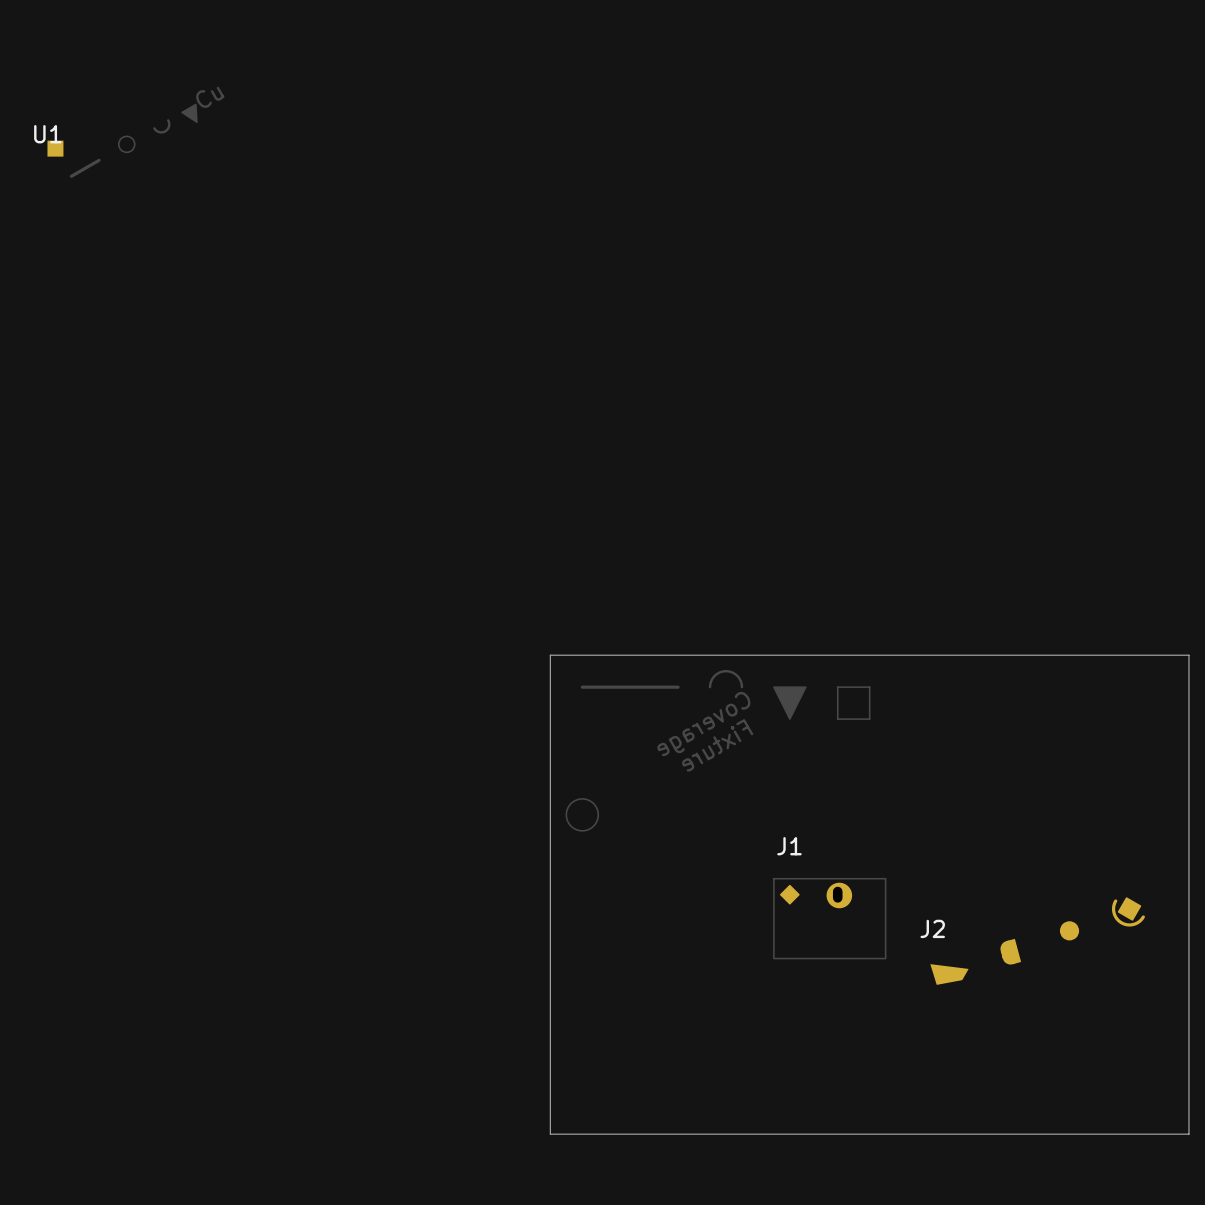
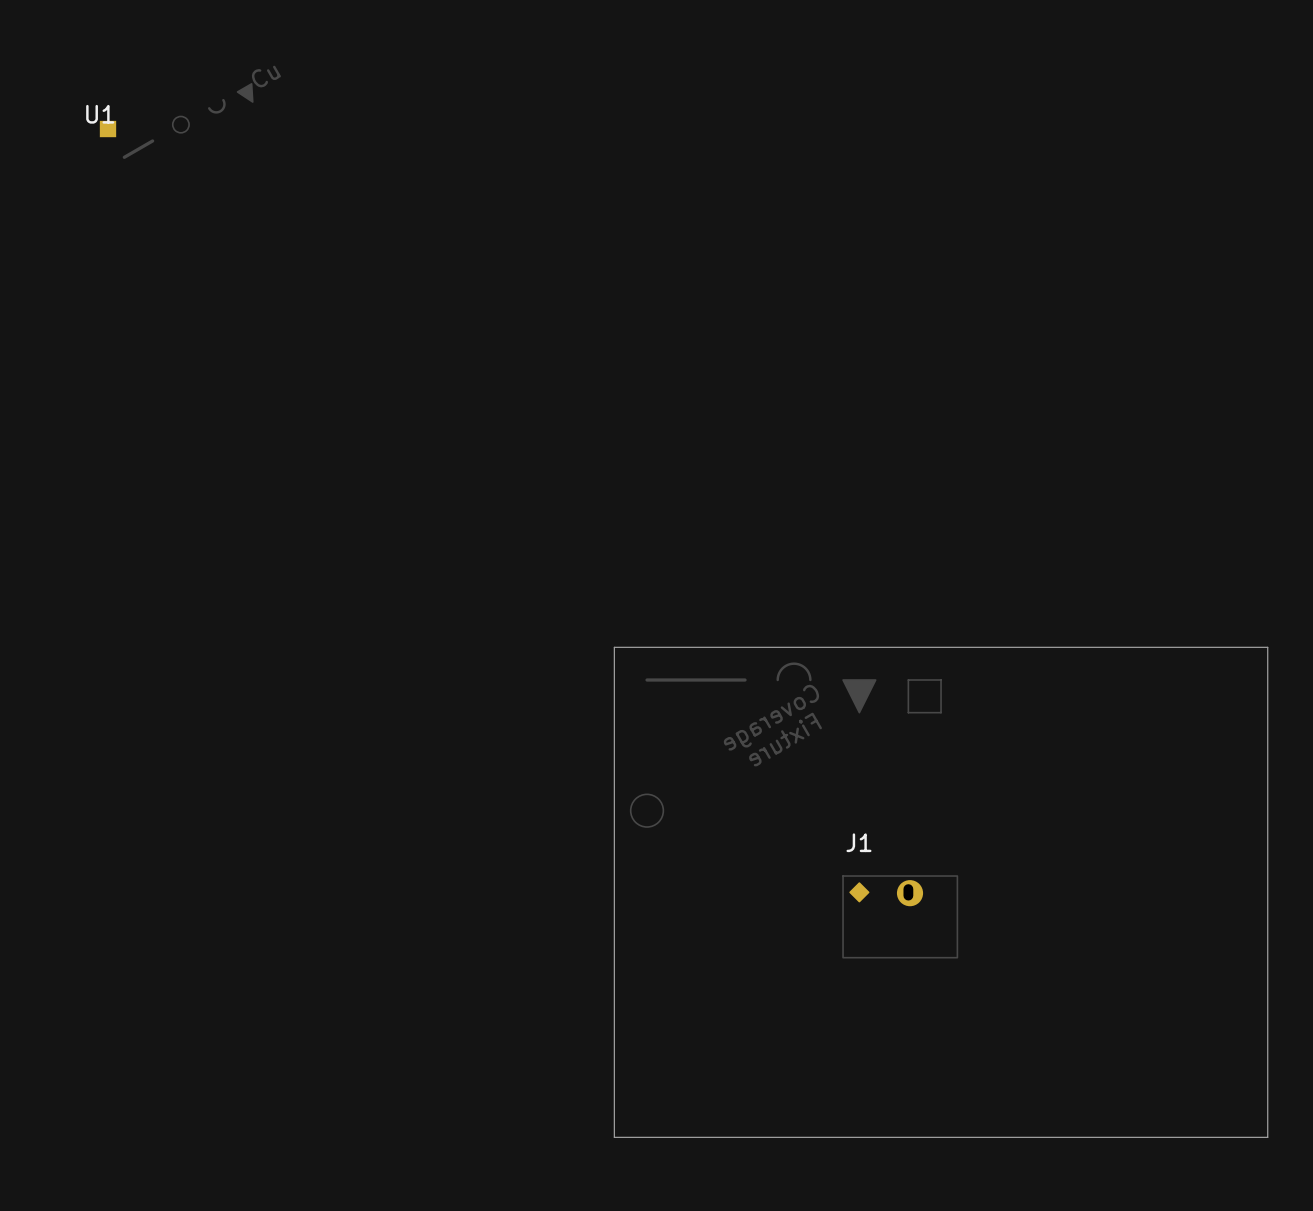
J2: (1037, 941) -> none

